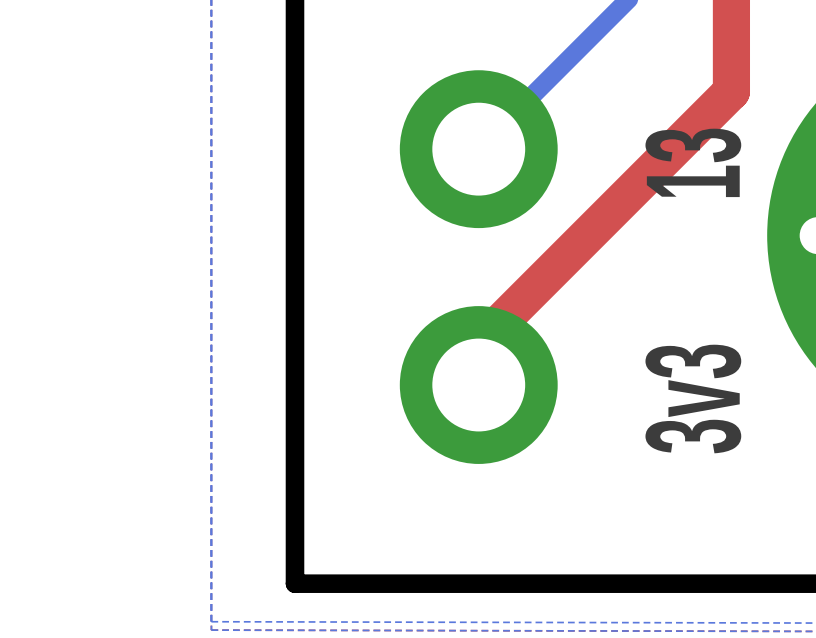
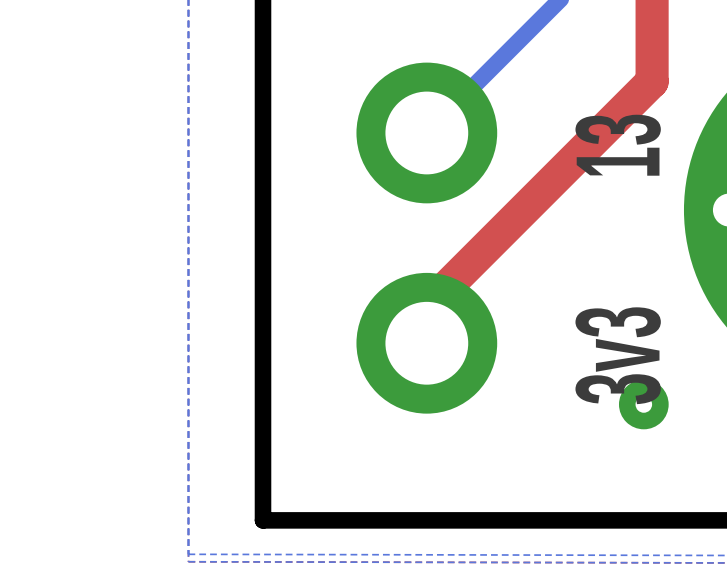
via: none -> (643, 404)

